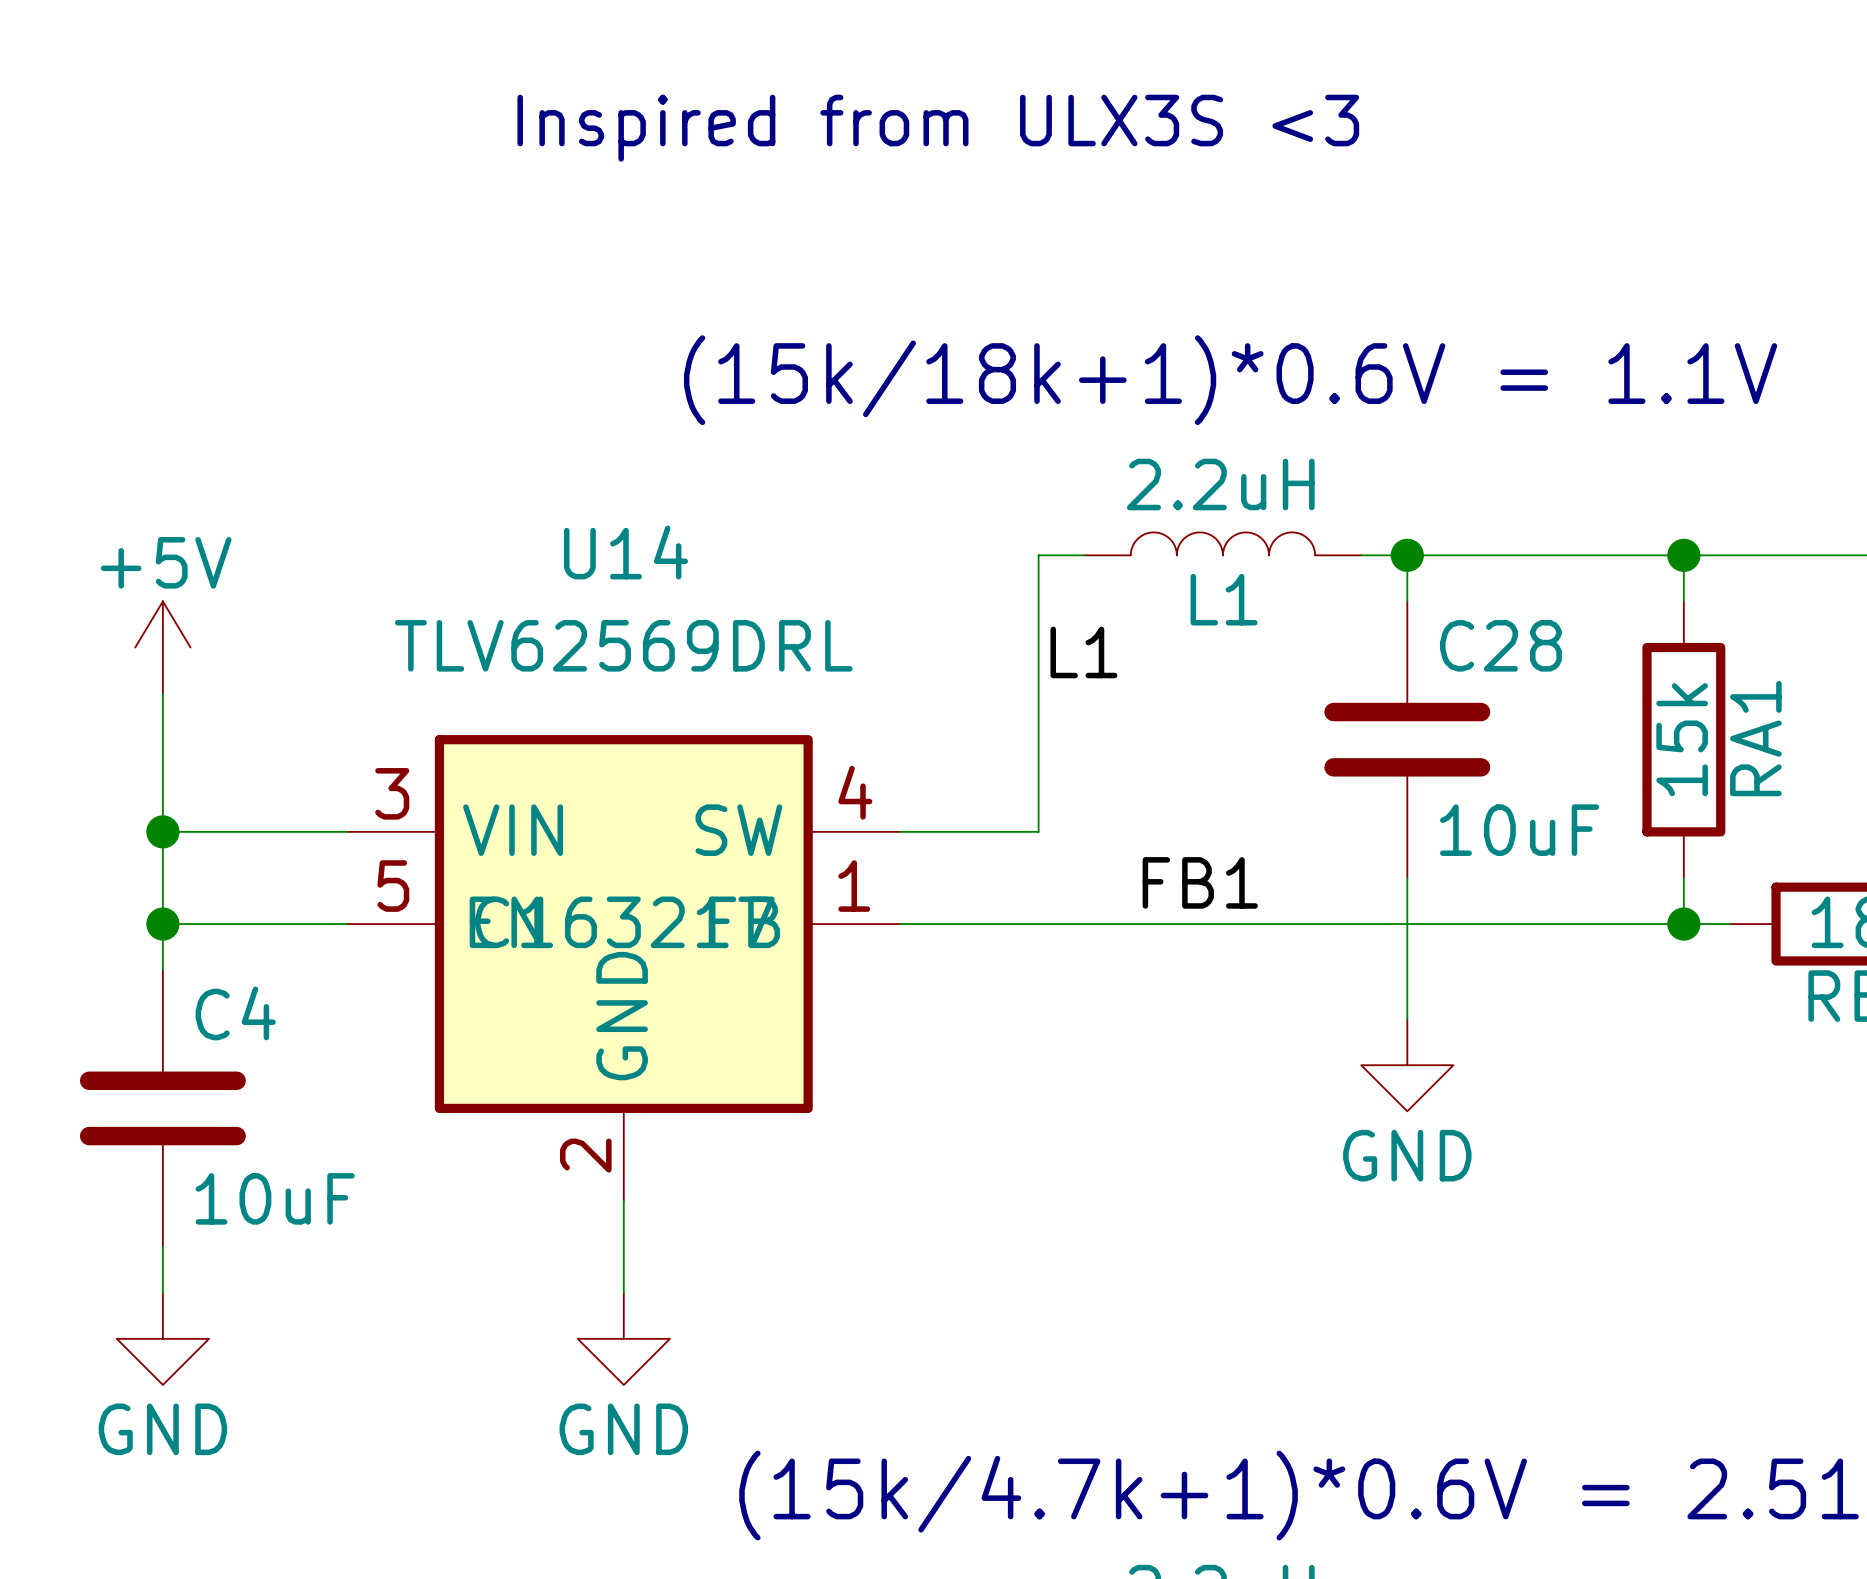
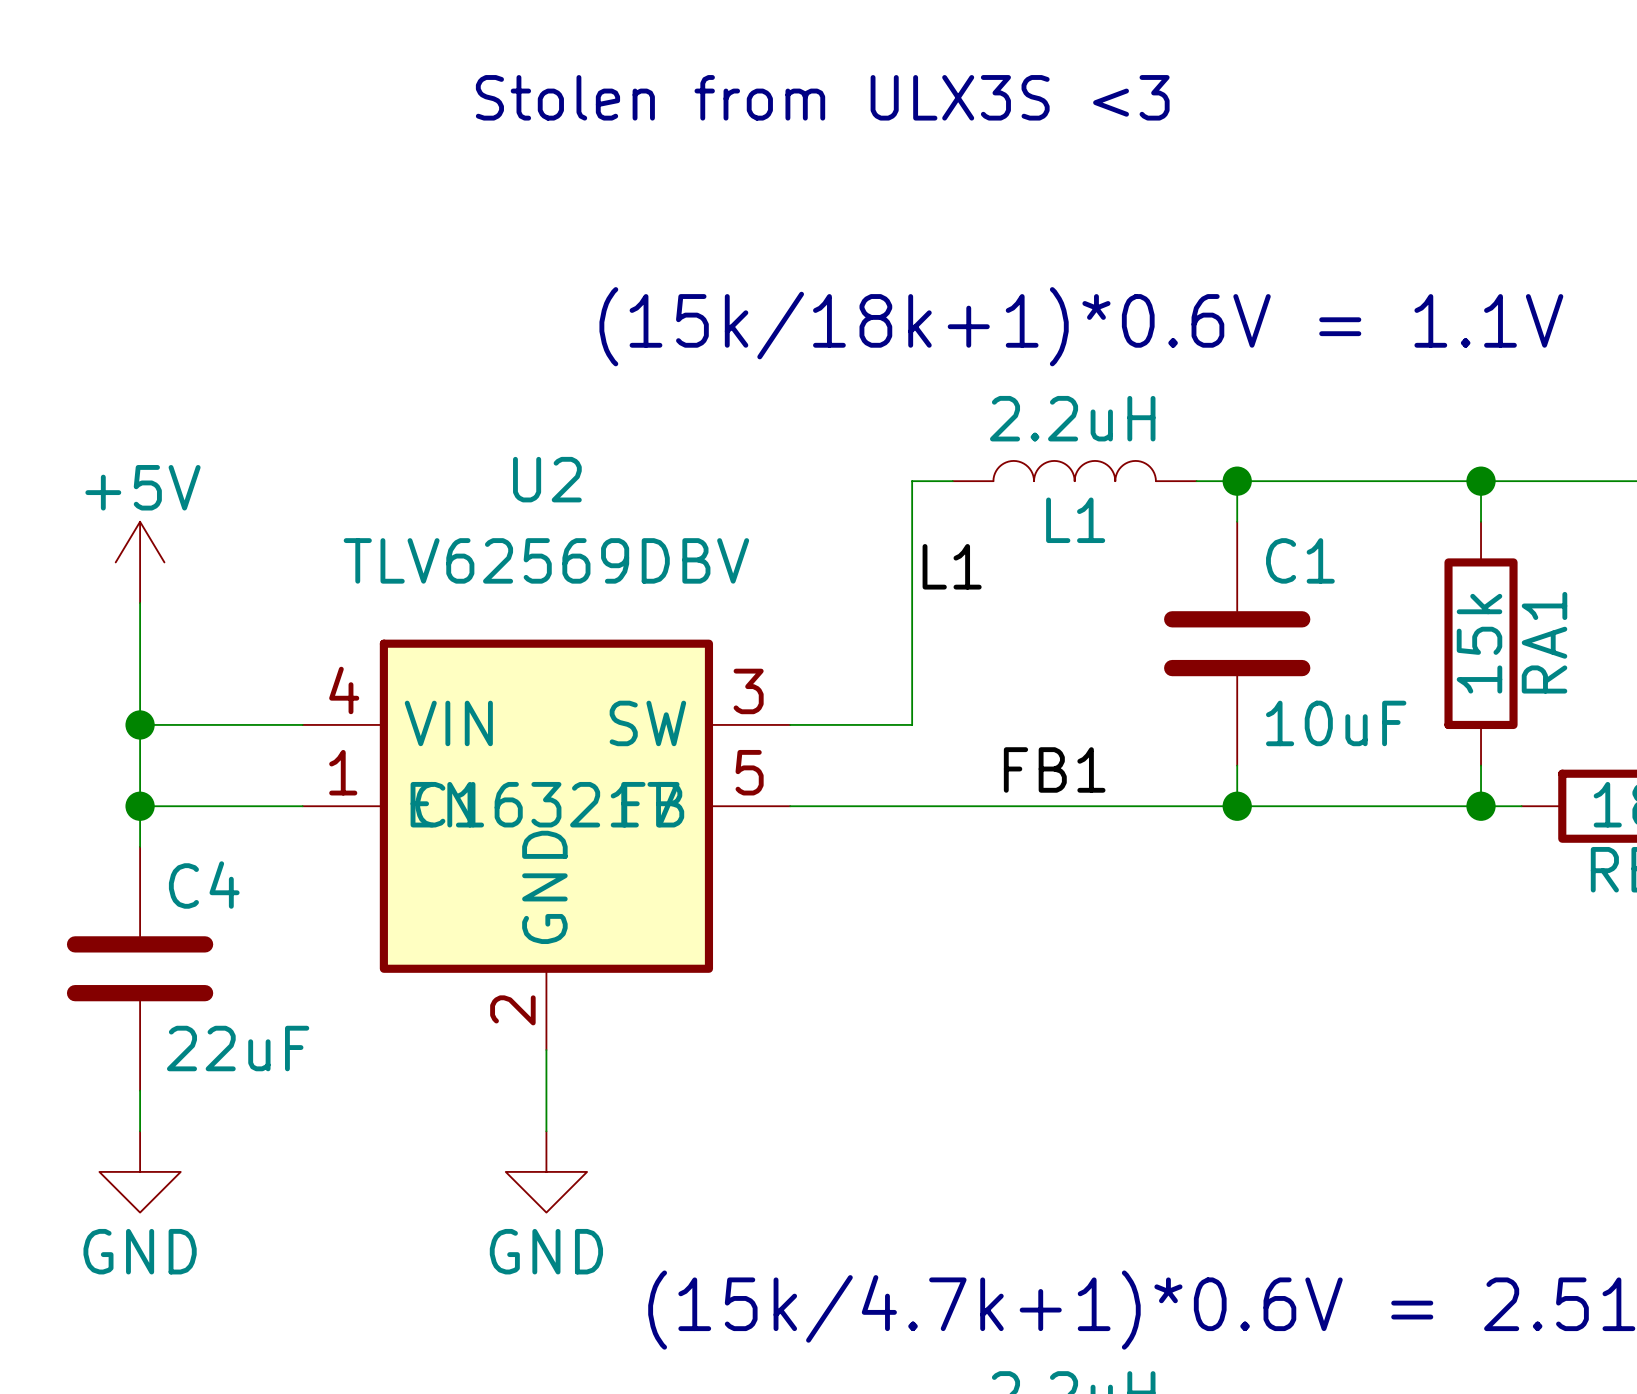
text: Inspired from ULX3S <3 (938, 128) -> Stolen from ULX3S <3 (822, 97)
U14 name: U14 (625, 552) -> U2 (547, 479)
U14 value: TLV62569DRL (623, 645) -> TLV62569DBV (546, 560)
C28 name: C28 (1500, 645) -> C1 (1300, 560)
U14 pin number: 4 (855, 792) -> 3 (748, 691)
U14 pin number: 3 (392, 793) -> 4 (344, 690)
U14 pin number: 5 (393, 886) -> 1 (343, 772)
U14 pin number: 1 (854, 886) -> 5 (749, 772)
wire: (1407, 924) (1407, 1019) -> none
junction: none -> (1237, 806)
power symbol: GND (1407, 1065) -> none
C4 value: 10uF (275, 1198) -> 22uF (238, 1048)

